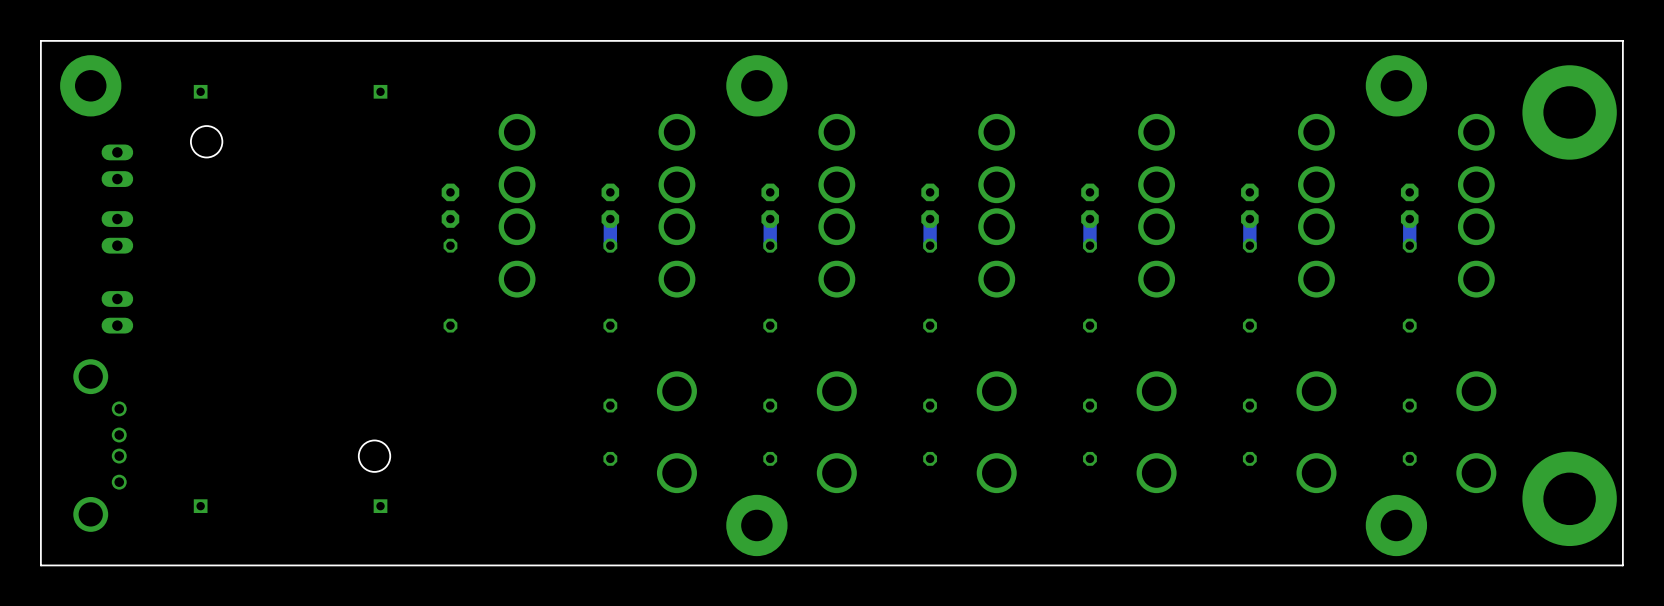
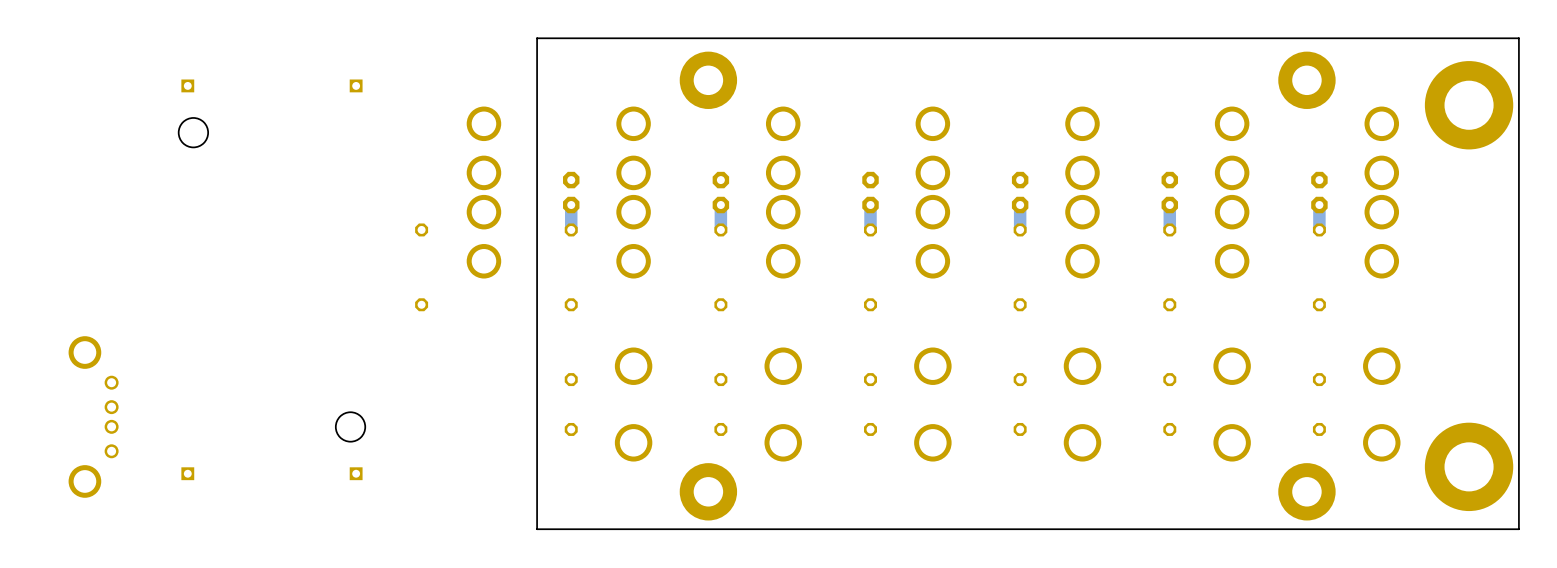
board edge: (573, 40) (40, 40) (40, 565) (573, 565) -> (537, 38) (537, 529)
part: (90, 85) -> none
part: (117, 165) -> none
part: (450, 205) -> none
part: (117, 232) -> none
part: (117, 312) -> none

